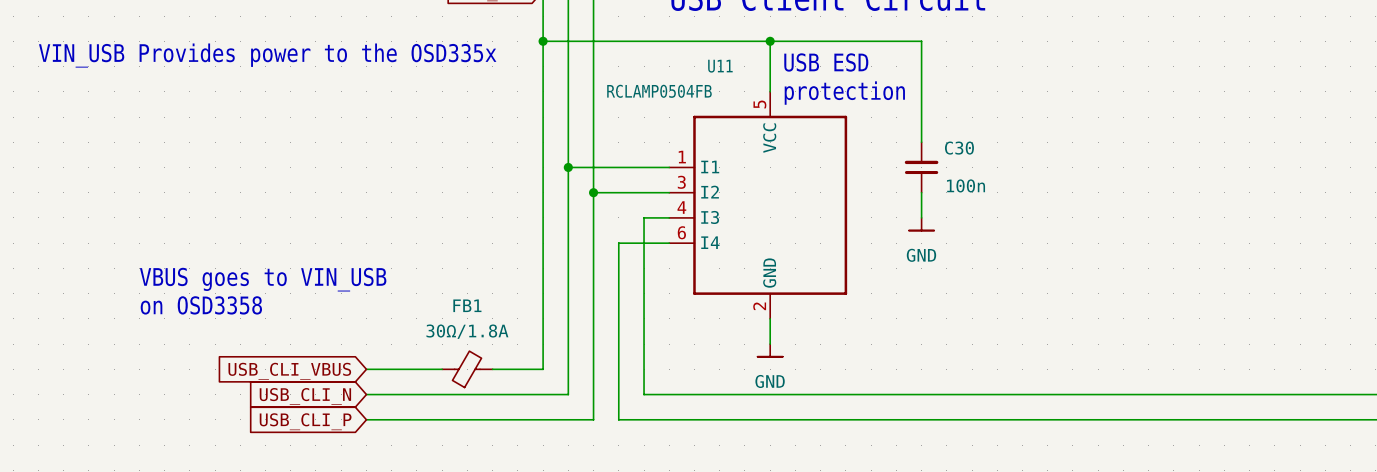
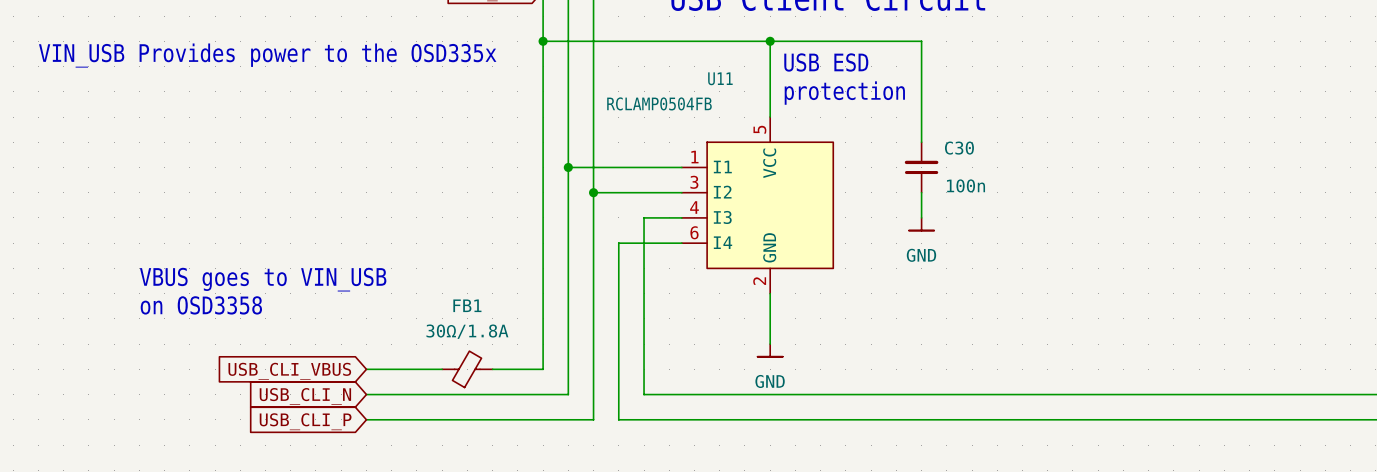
U11 symbol: [669, 91, 848, 319] -> [681, 117, 834, 294]

